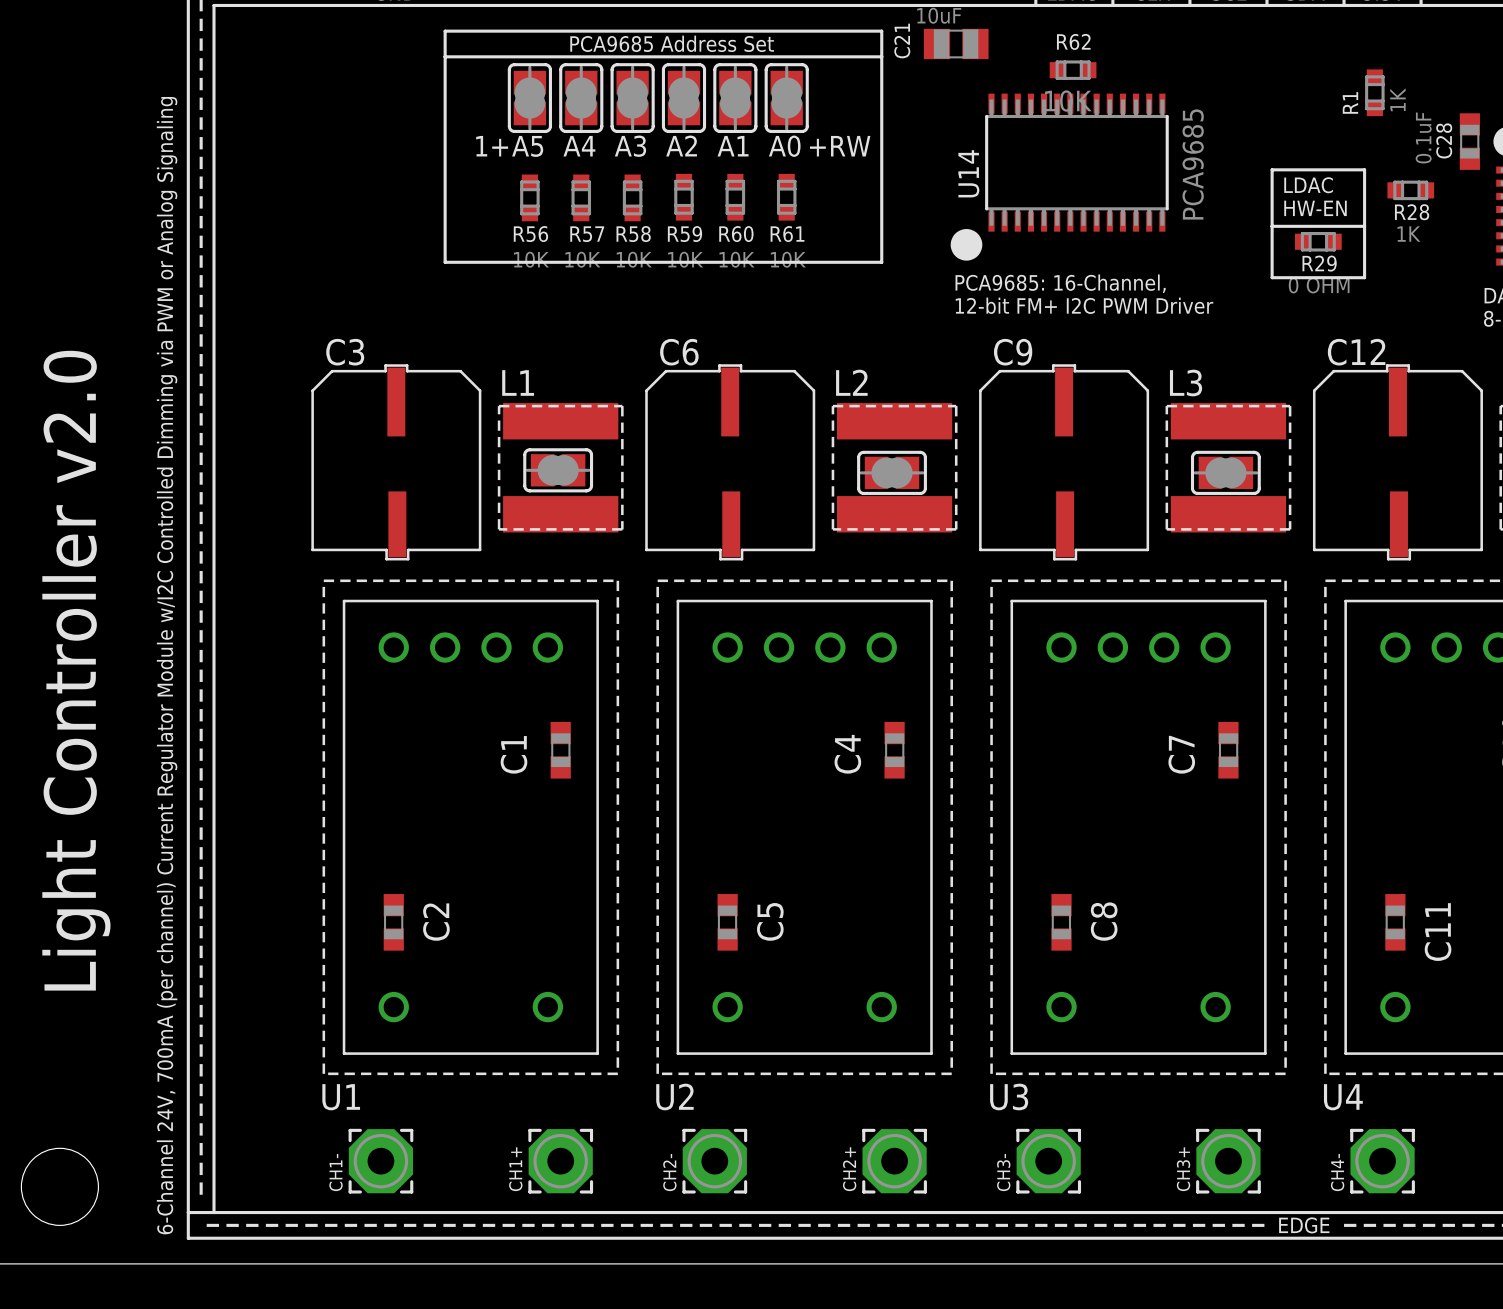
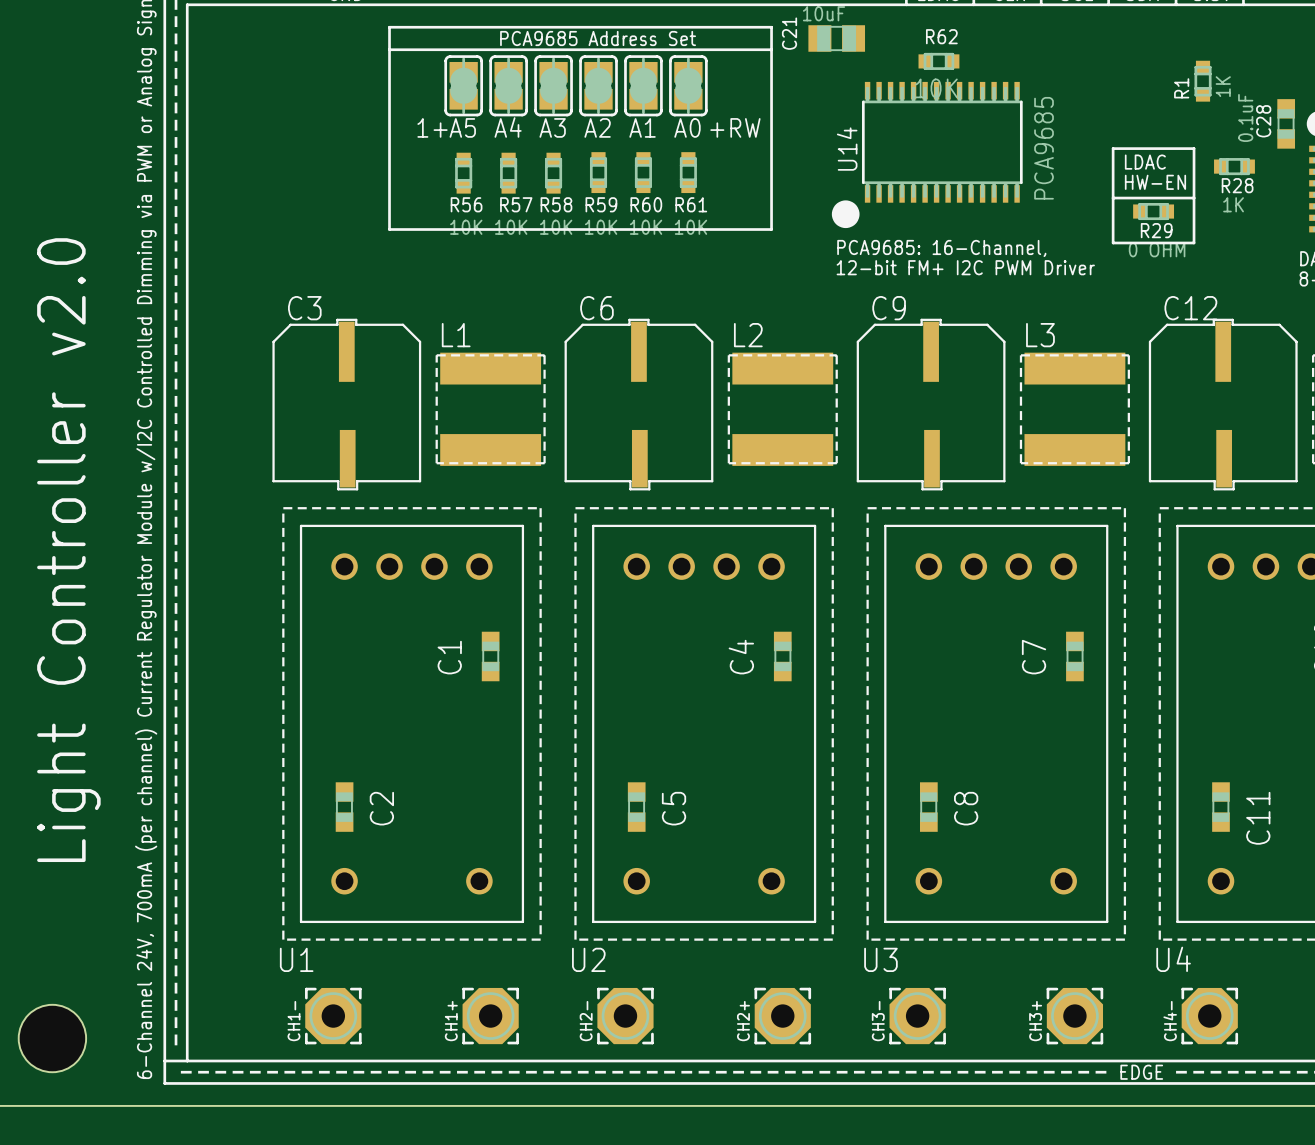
part: (558, 470) -> none
part: (892, 472) -> none
part: (1225, 472) -> none

